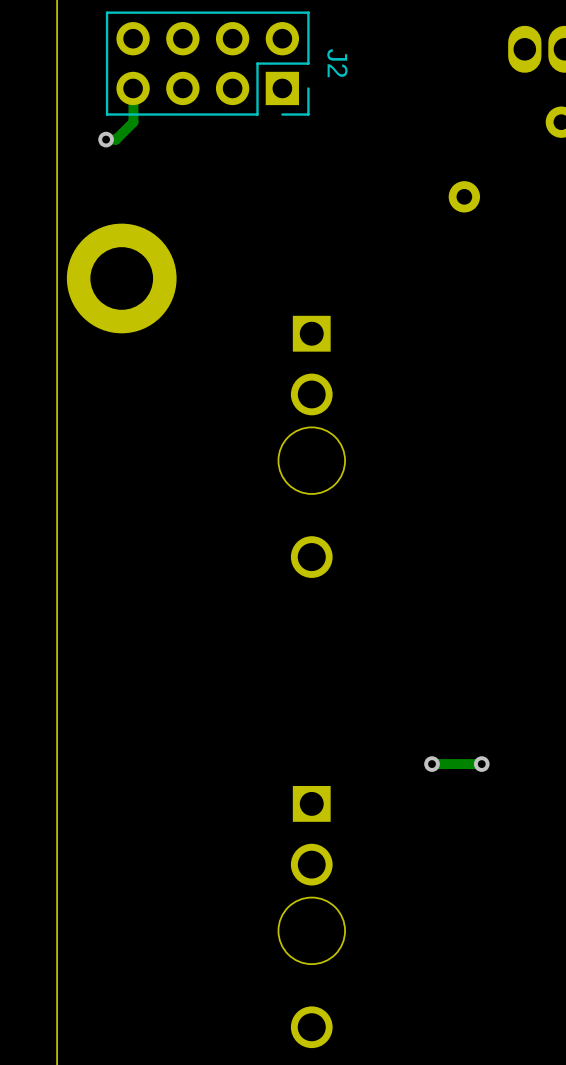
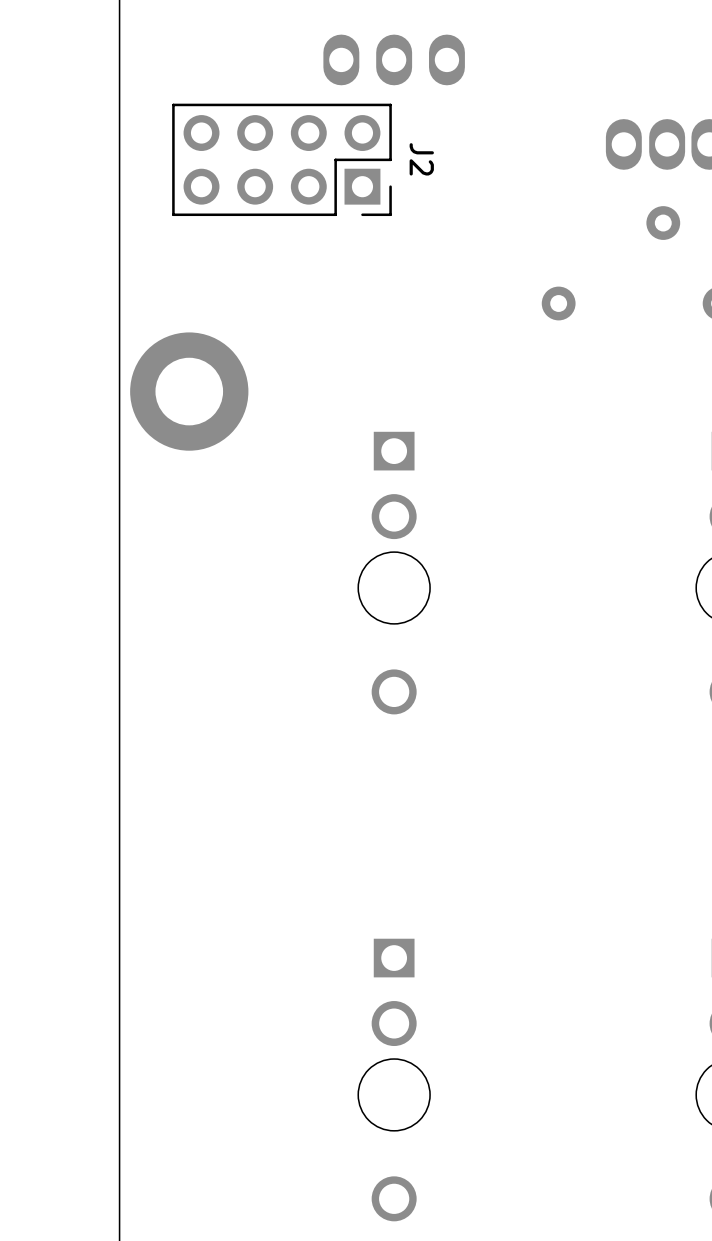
track: (133, 88) (133, 122) (116, 139) (106, 139) -> none
via: (106, 139) -> none
via: (432, 764) -> none
track: (481, 764) (432, 764) -> none
via: (481, 764) -> none

